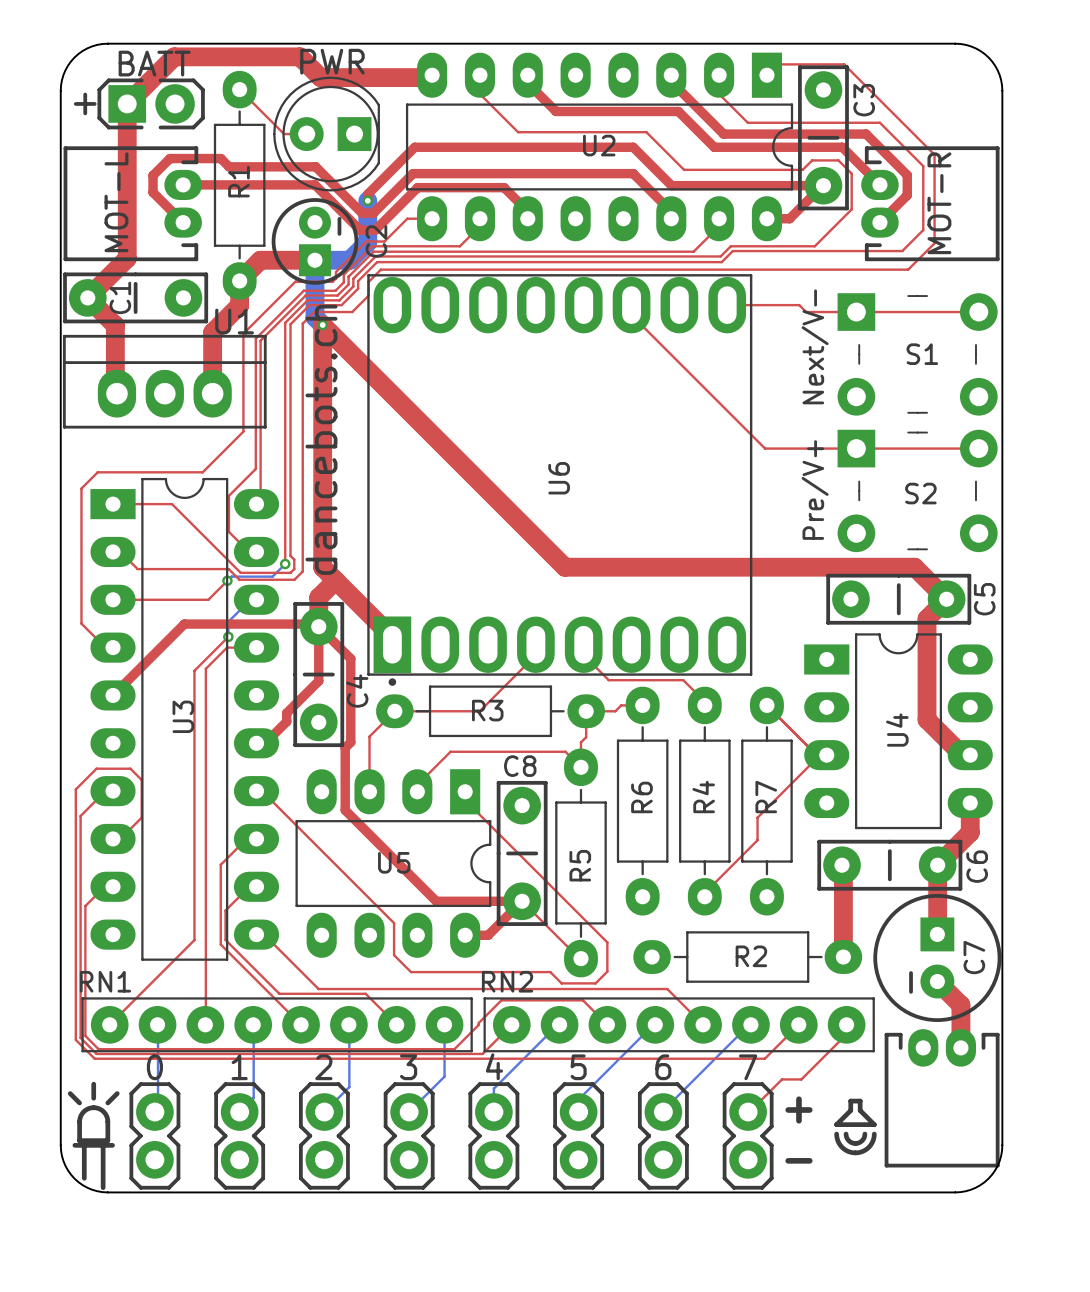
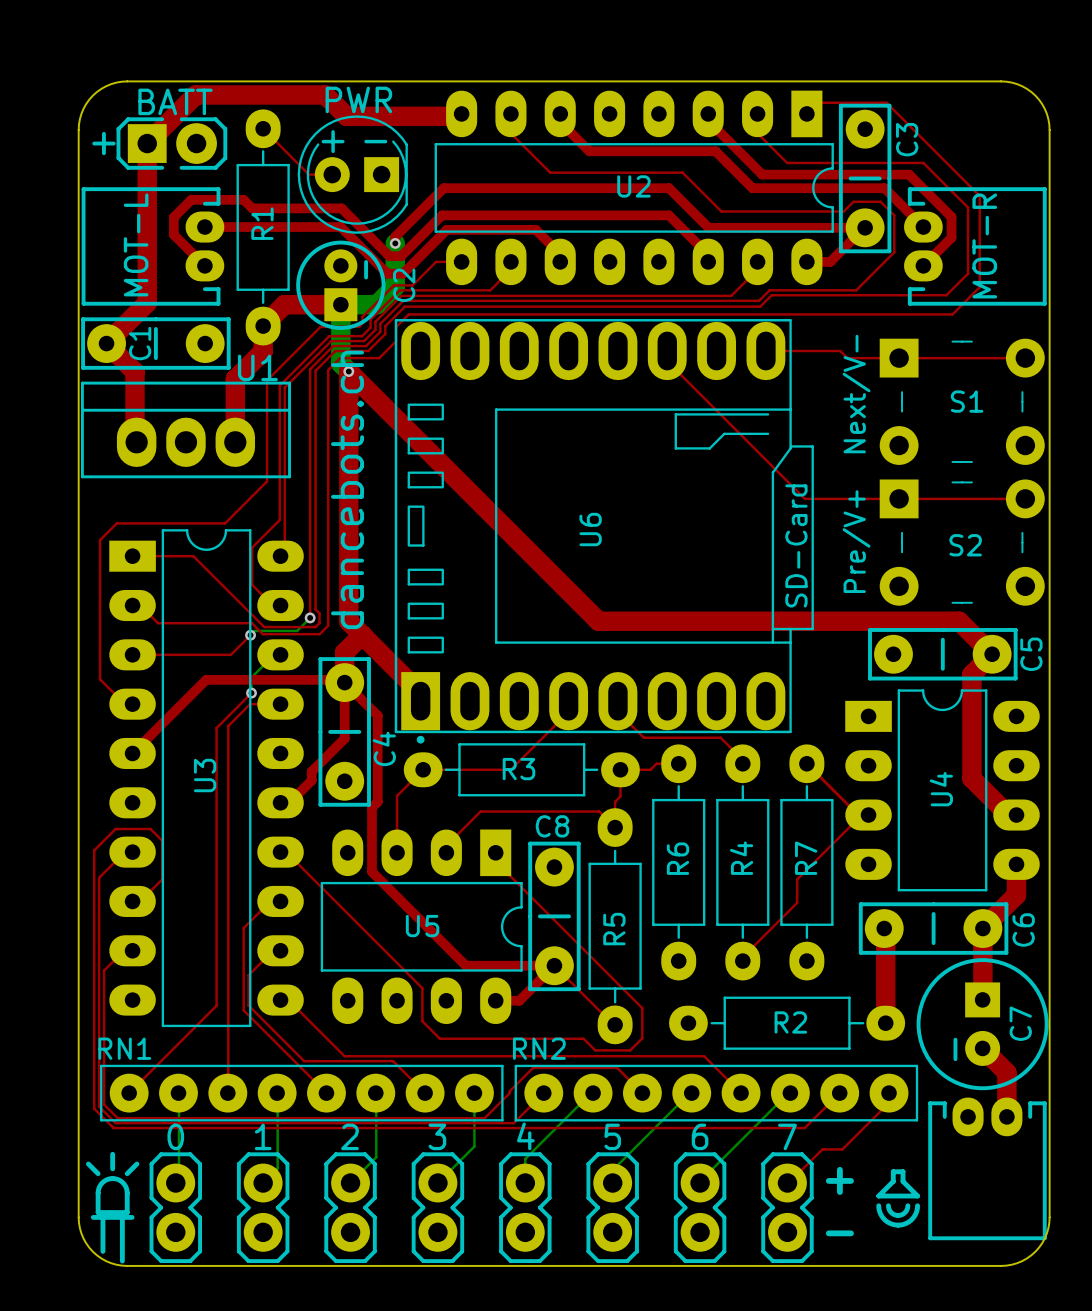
part footprint: [273, 76, 380, 192] -> [297, 115, 408, 234]
U6 footprint: [367, 274, 753, 686] -> [394, 319, 814, 744]

